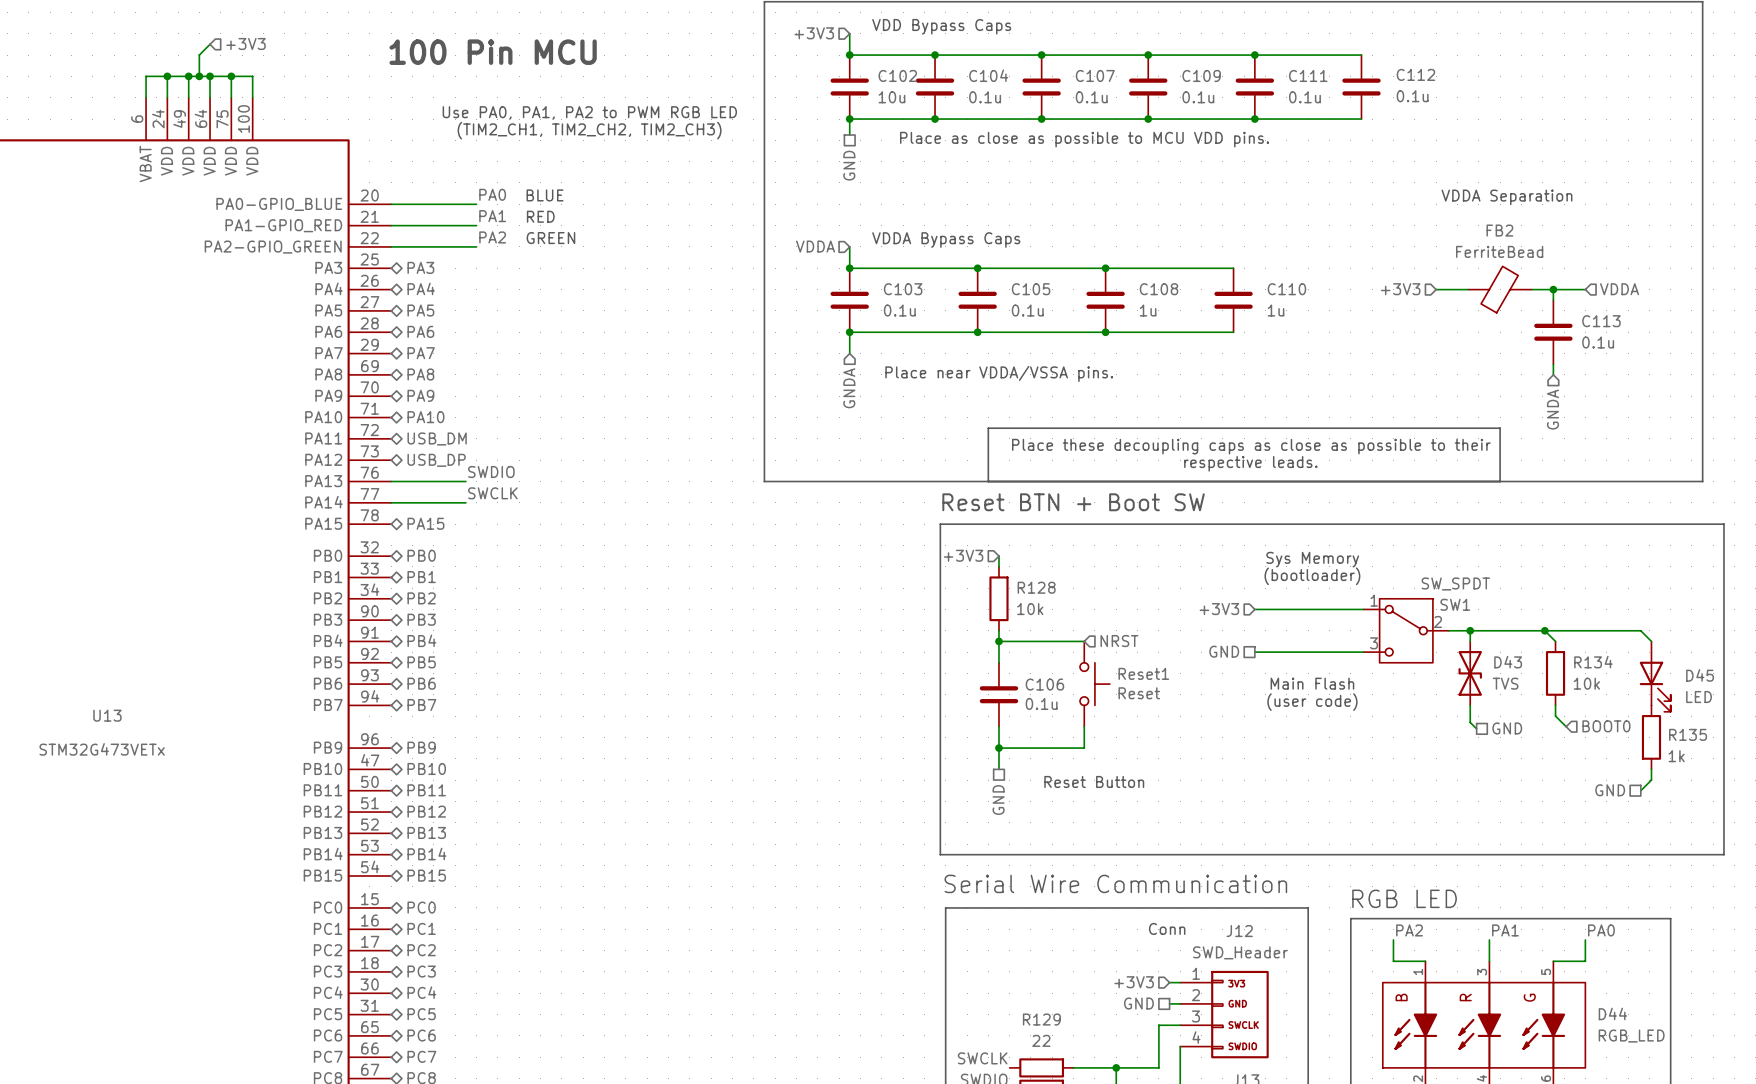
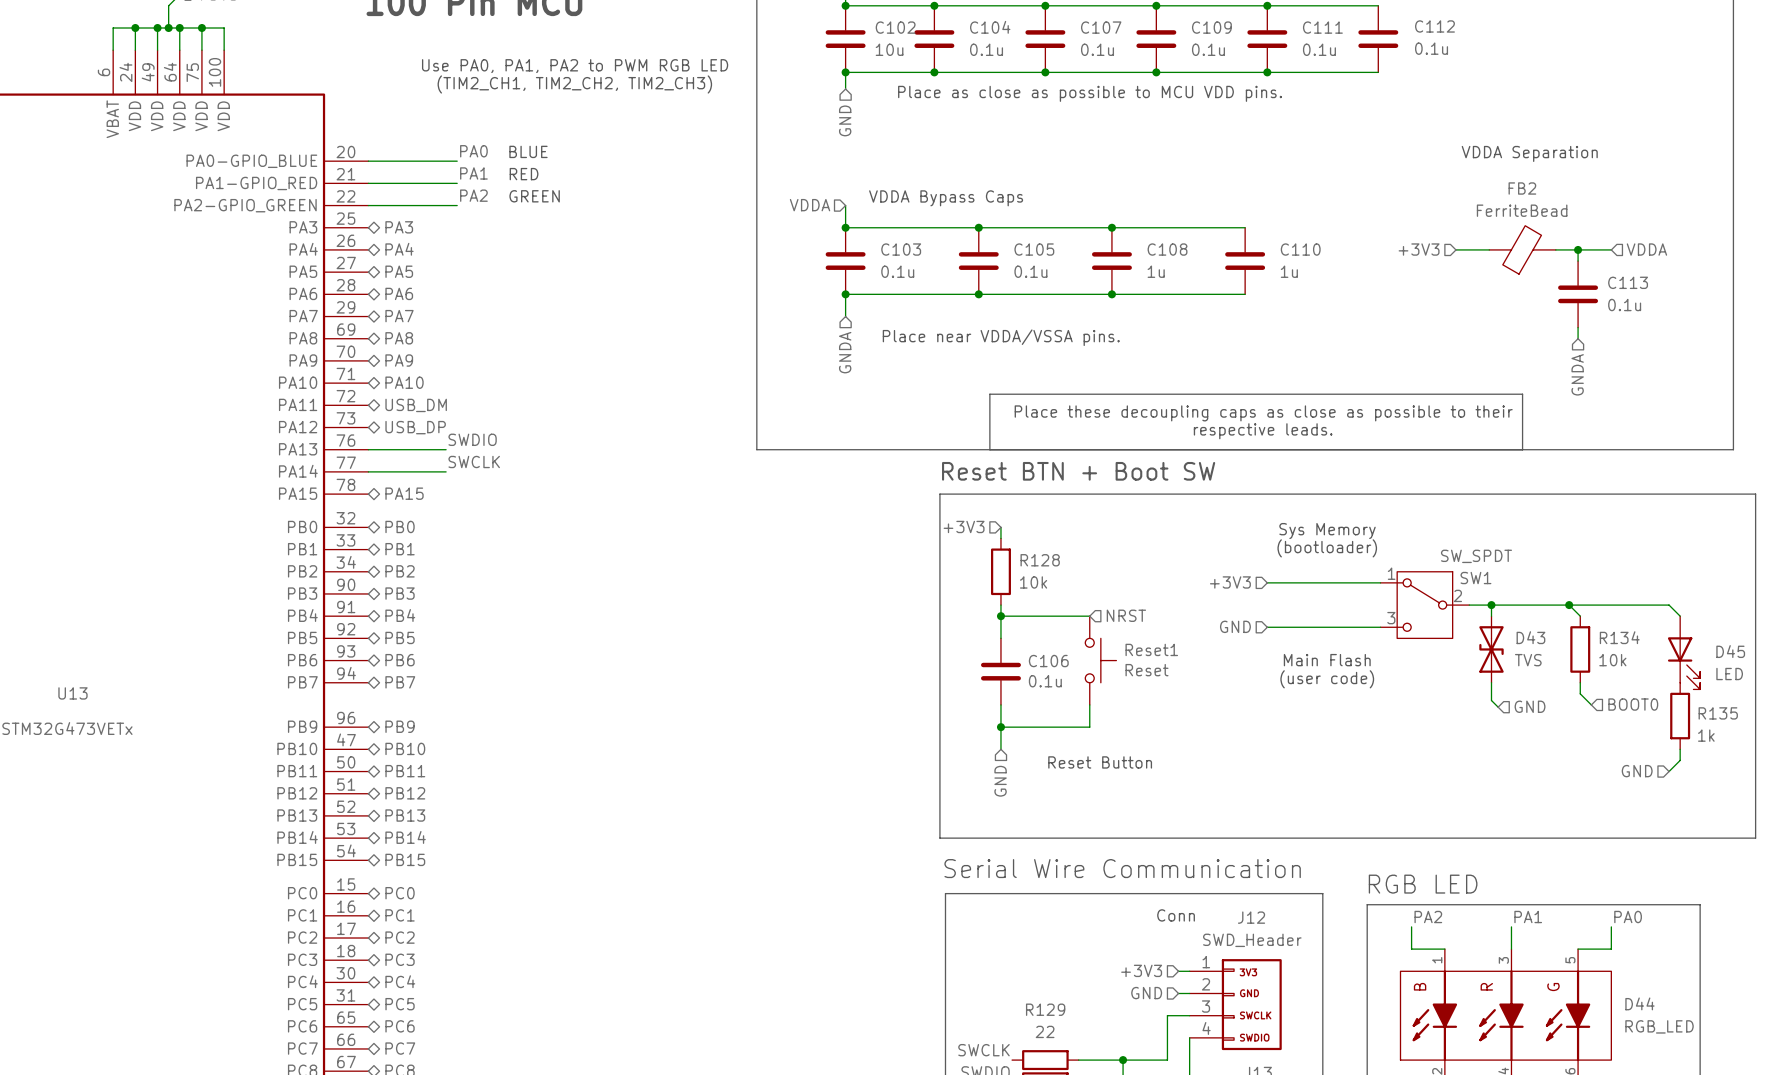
hierarchical label shape: passive (849, 165) -> input (845, 120)
hierarchical label shape: passive (1224, 651) -> input (1235, 626)
hierarchical label shape: passive (1507, 728) -> input (1530, 706)
hierarchical label shape: passive (1610, 790) -> input (1637, 771)
hierarchical label shape: passive (998, 800) -> input (1000, 781)
hierarchical label shape: passive (1138, 1003) -> input (1146, 993)

